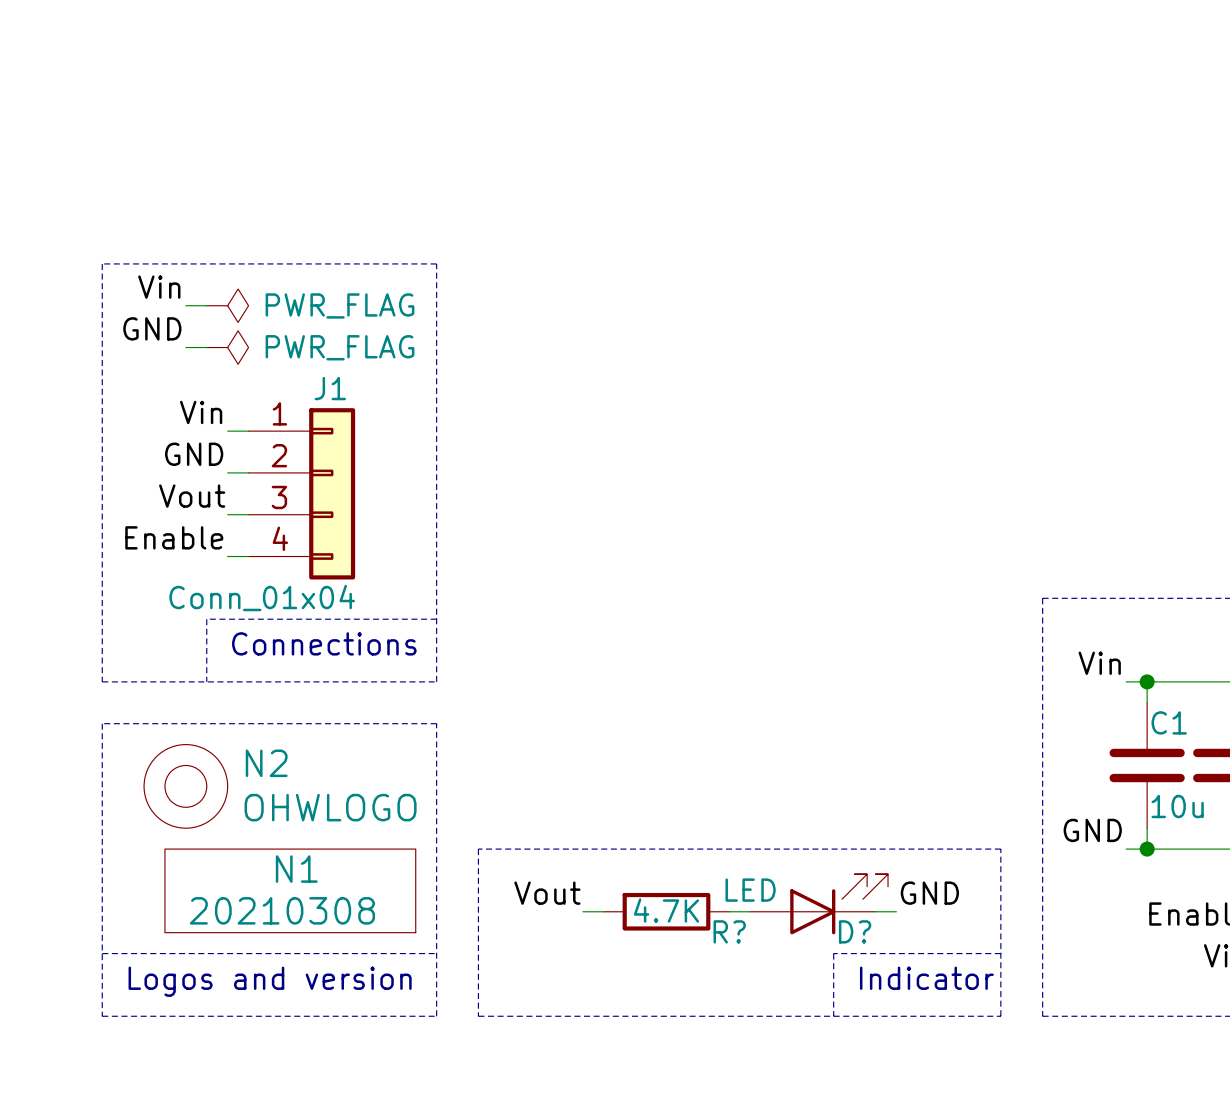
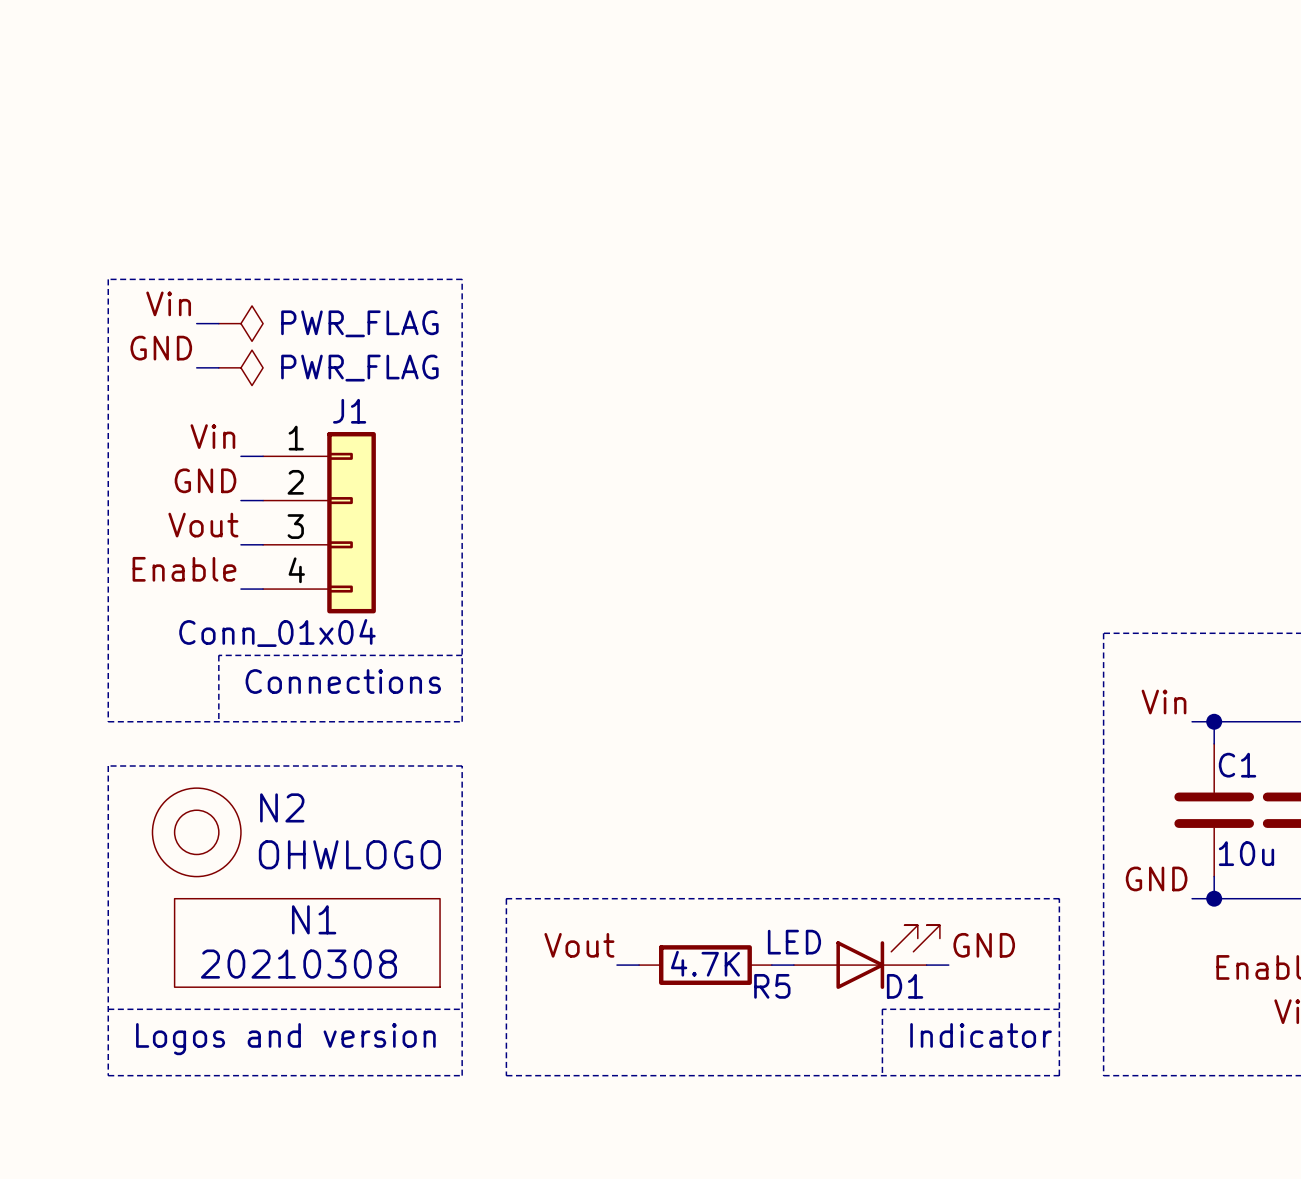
R? name: R? (729, 931) -> R5 (772, 986)
D? name: D? (855, 931) -> D1 (905, 986)

